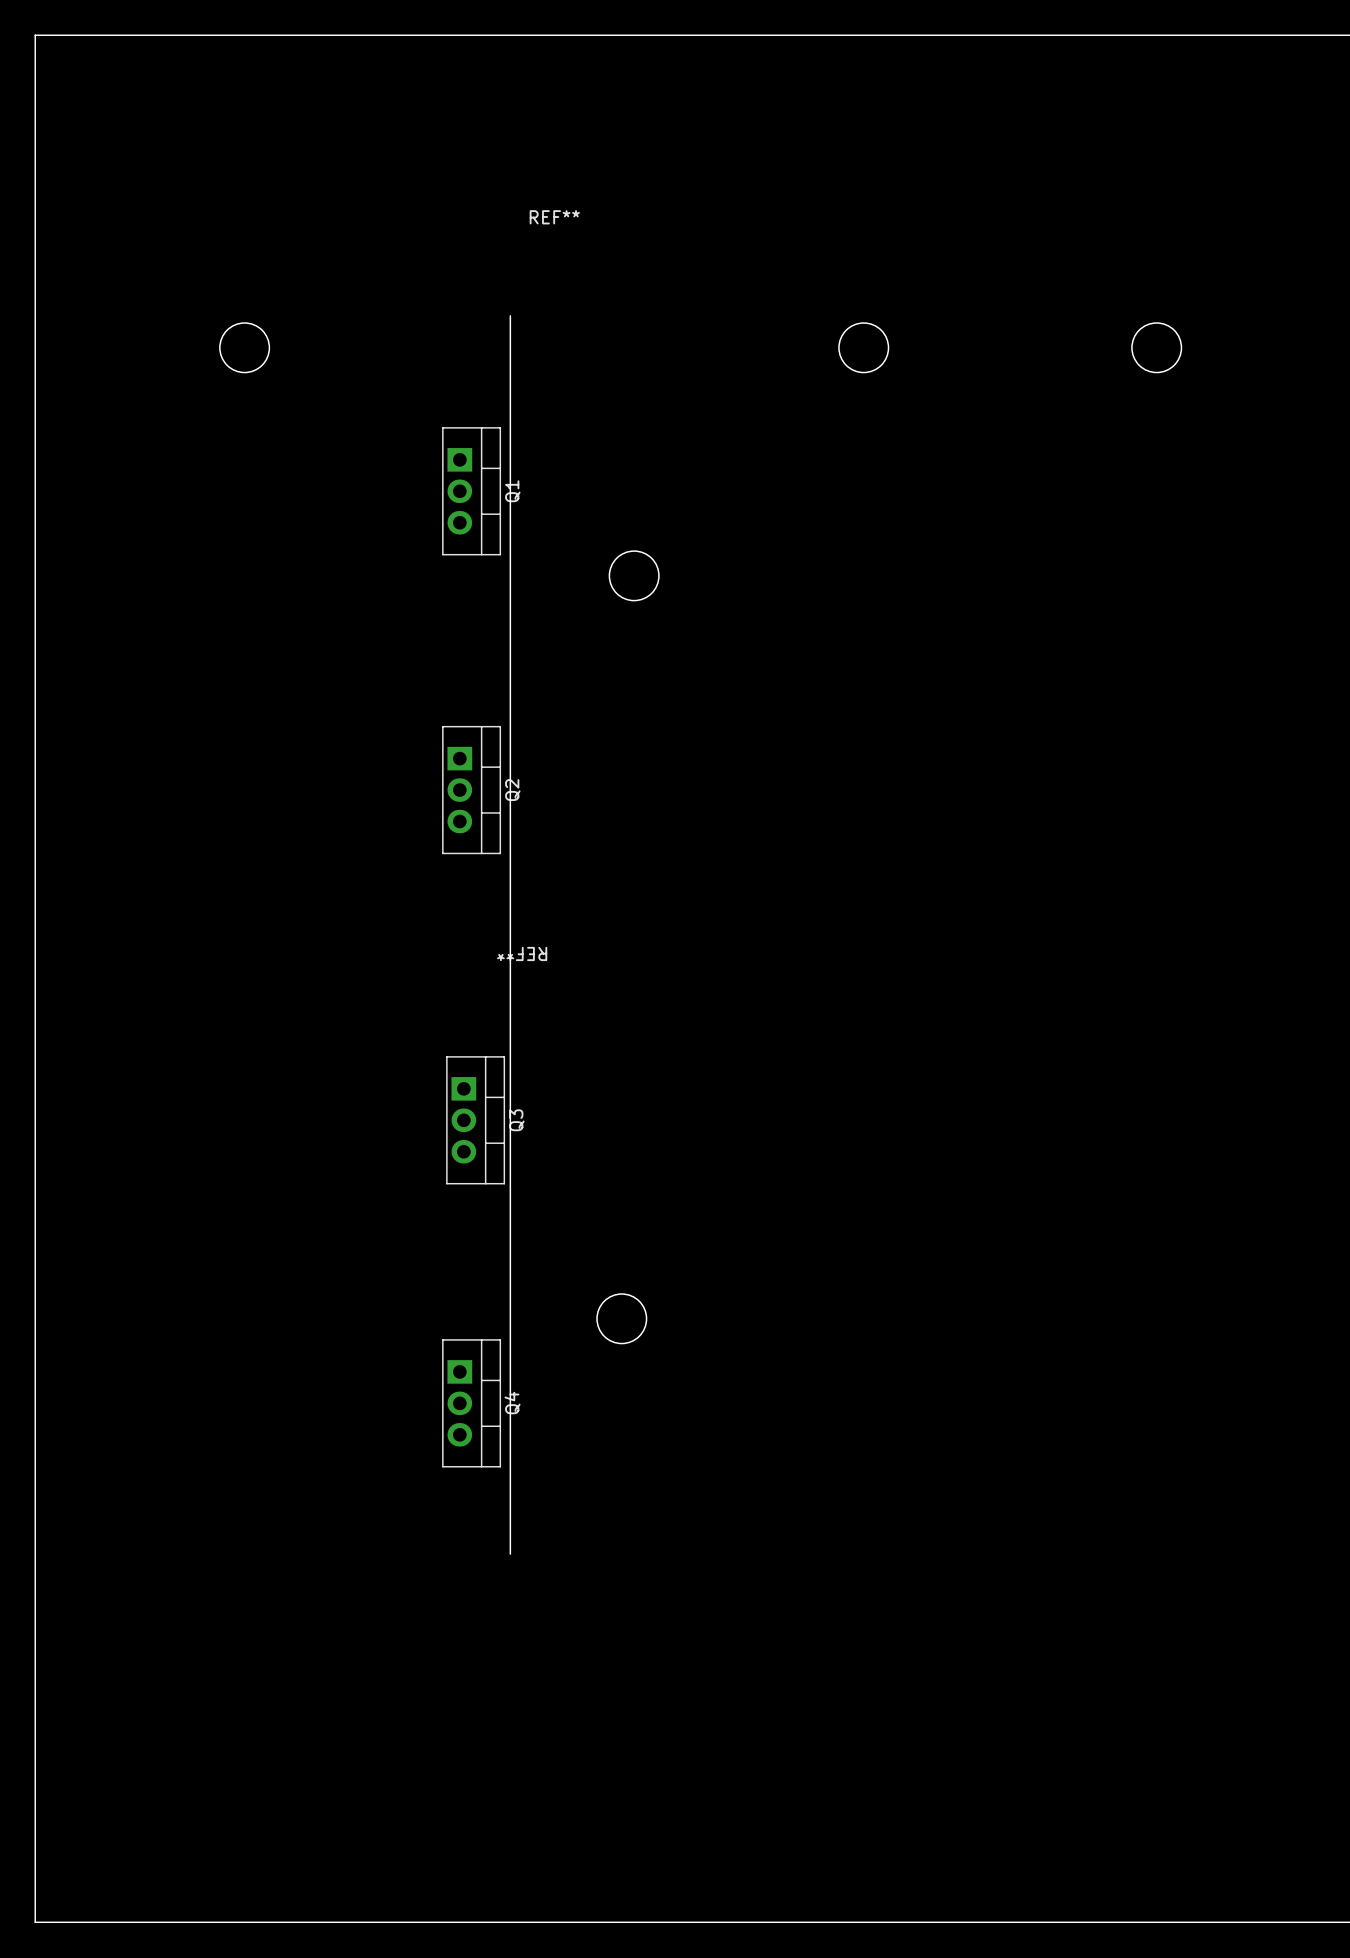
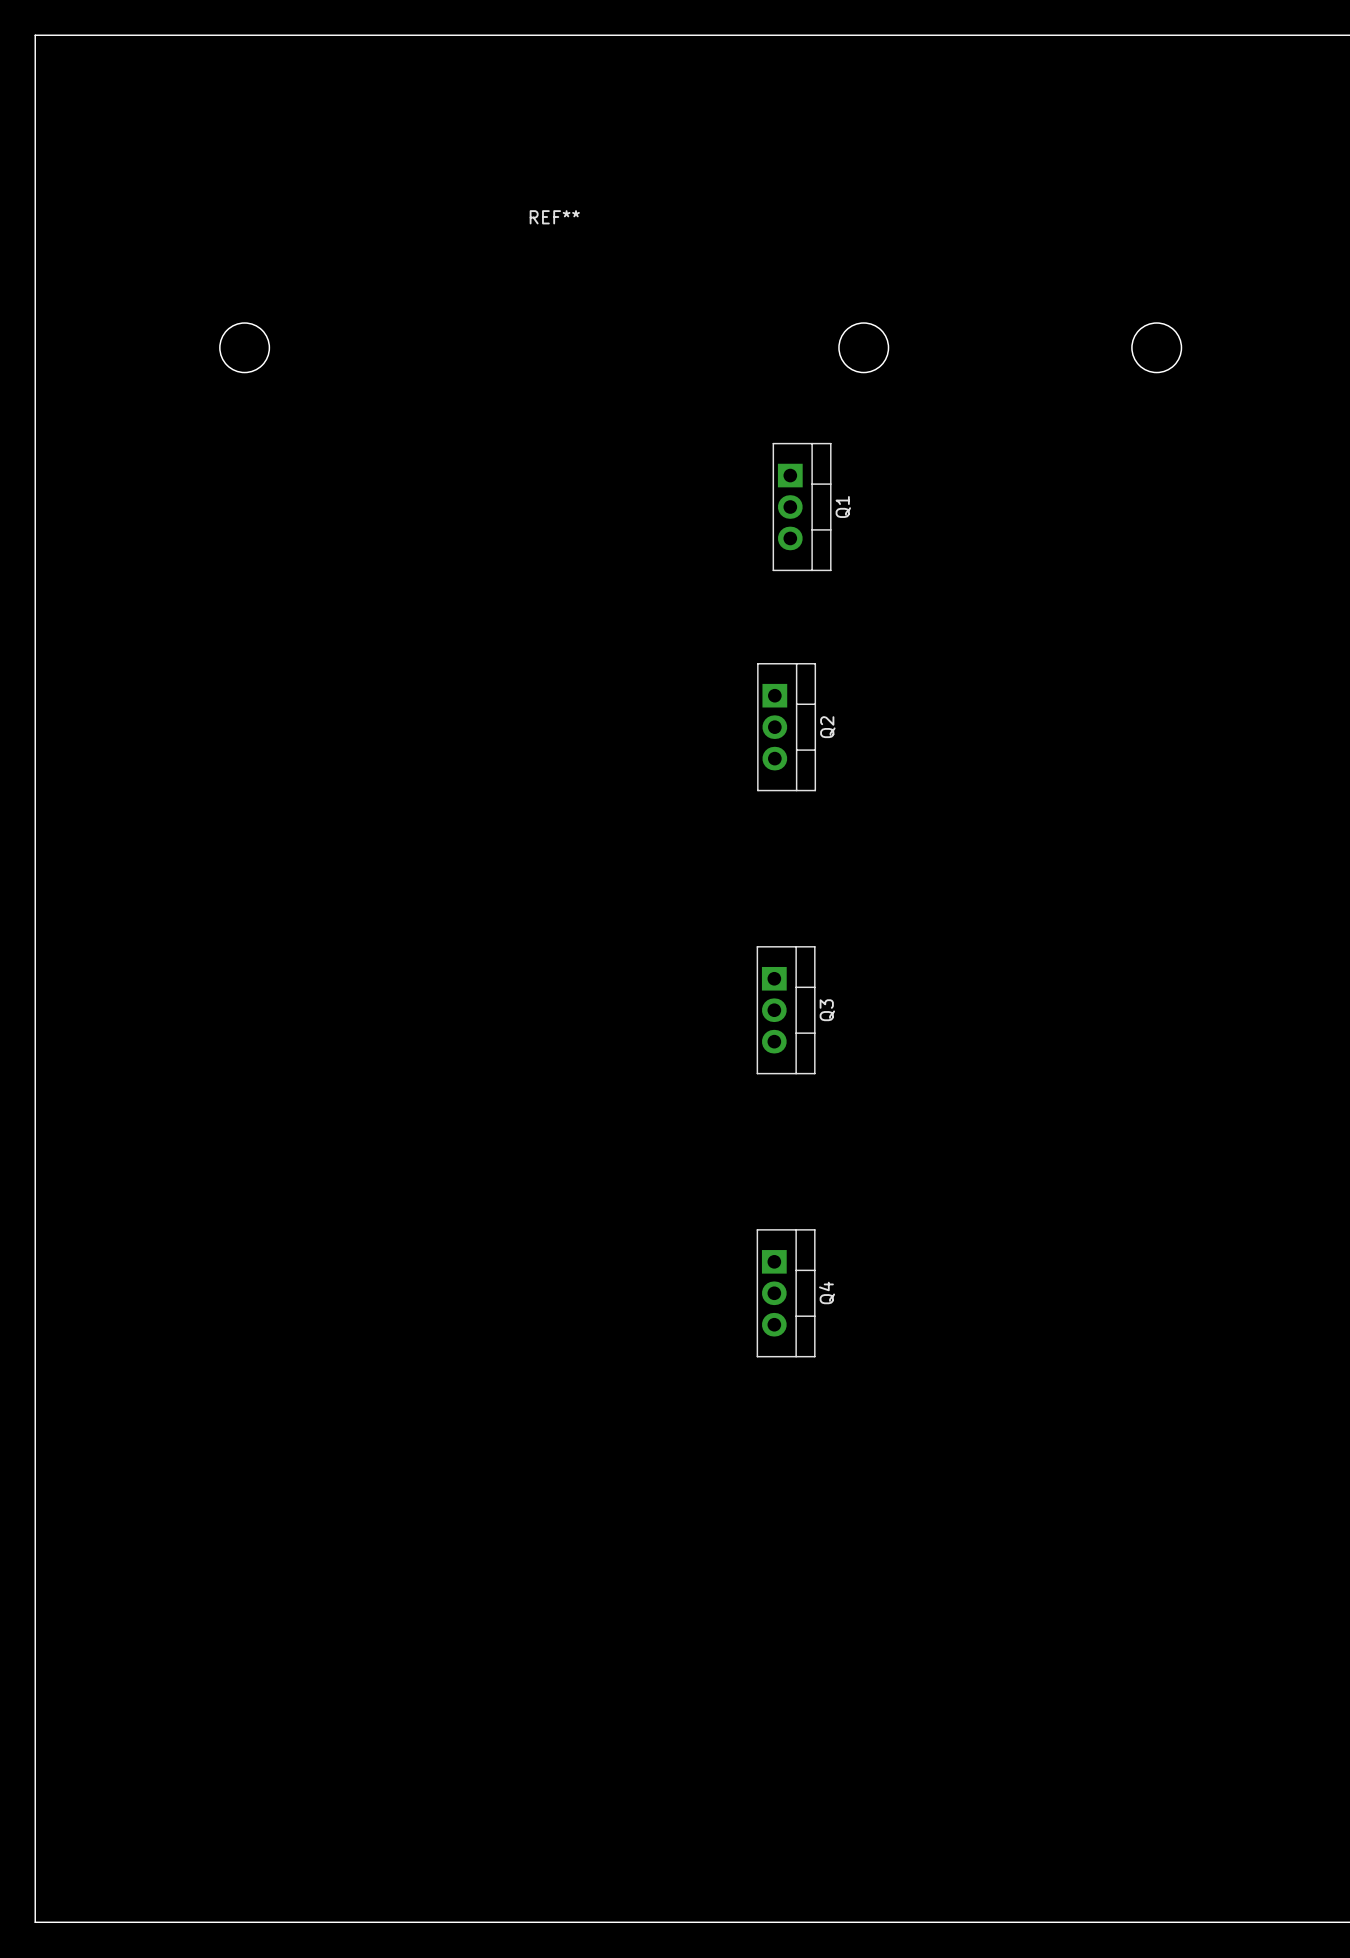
Q1 position: (471, 491) -> (802, 507)
Q2 position: (471, 790) -> (786, 727)
REF**: (584, 934) -> none
Q3 position: (475, 1120) -> (786, 1010)
Q4 position: (471, 1403) -> (786, 1293)

